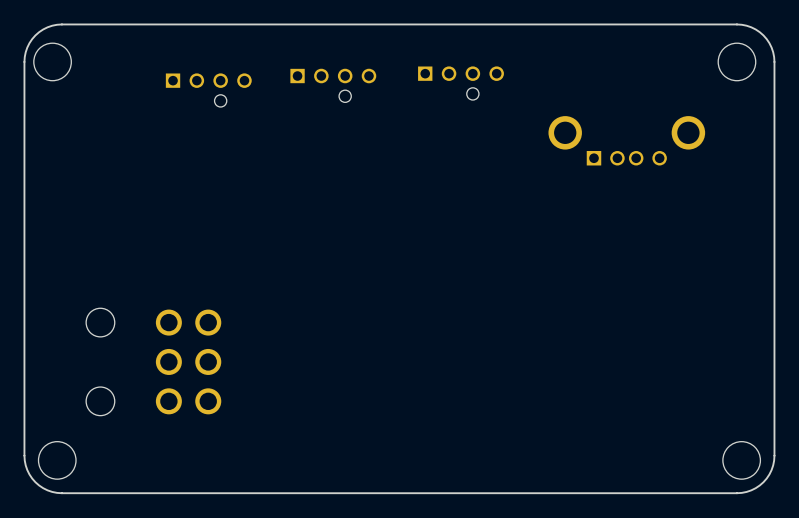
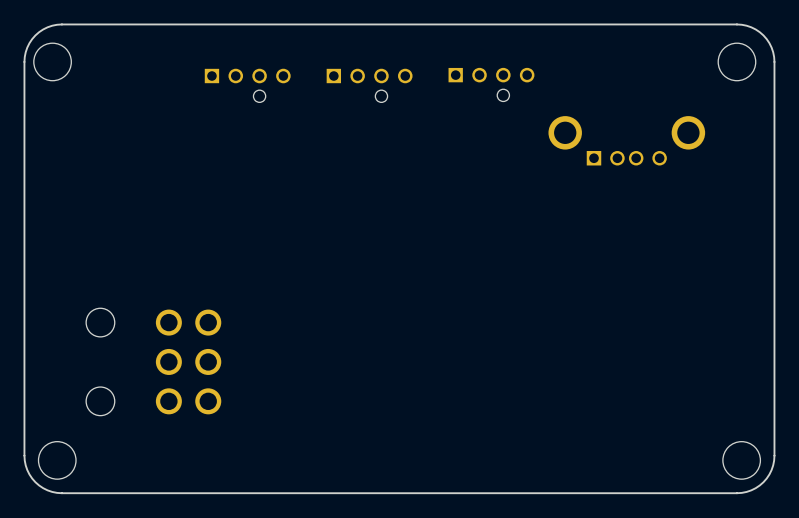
part position: (461, 83) -> (491, 84)
part position: (333, 85) -> (369, 85)
part position: (208, 90) -> (247, 85)

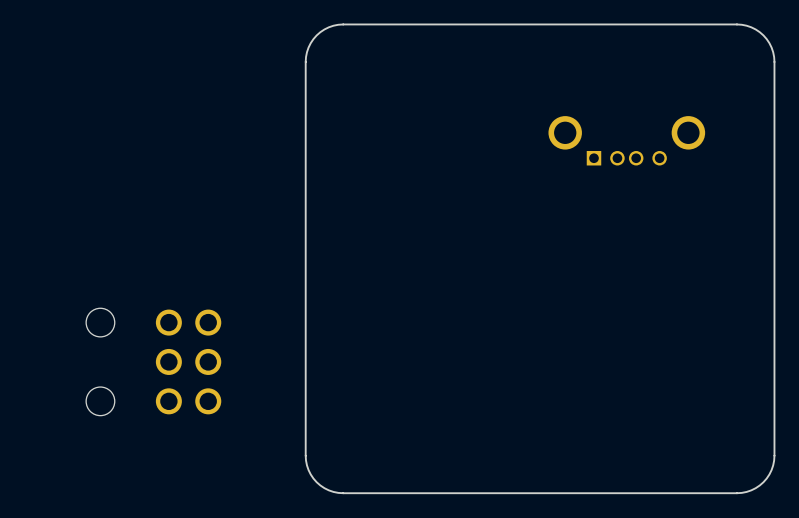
board edge: (343, 24) (57, 24) (47, 27) (35, 35) (27, 47) (24, 61) (24, 455) (25, 465) (32, 478) (47, 490) (61, 493) (343, 493) -> (343, 24) (328, 27) (316, 35) (308, 47) (305, 61) (306, 460) (310, 474) (320, 485) (333, 491) (343, 493)
round board edge: [33, 42, 72, 81] -> none
round board edge: [717, 42, 756, 81] -> none
part: (491, 84) -> none
part: (247, 85) -> none
part: (369, 85) -> none
round board edge: [38, 441, 77, 480] -> none
round board edge: [722, 441, 761, 480] -> none

